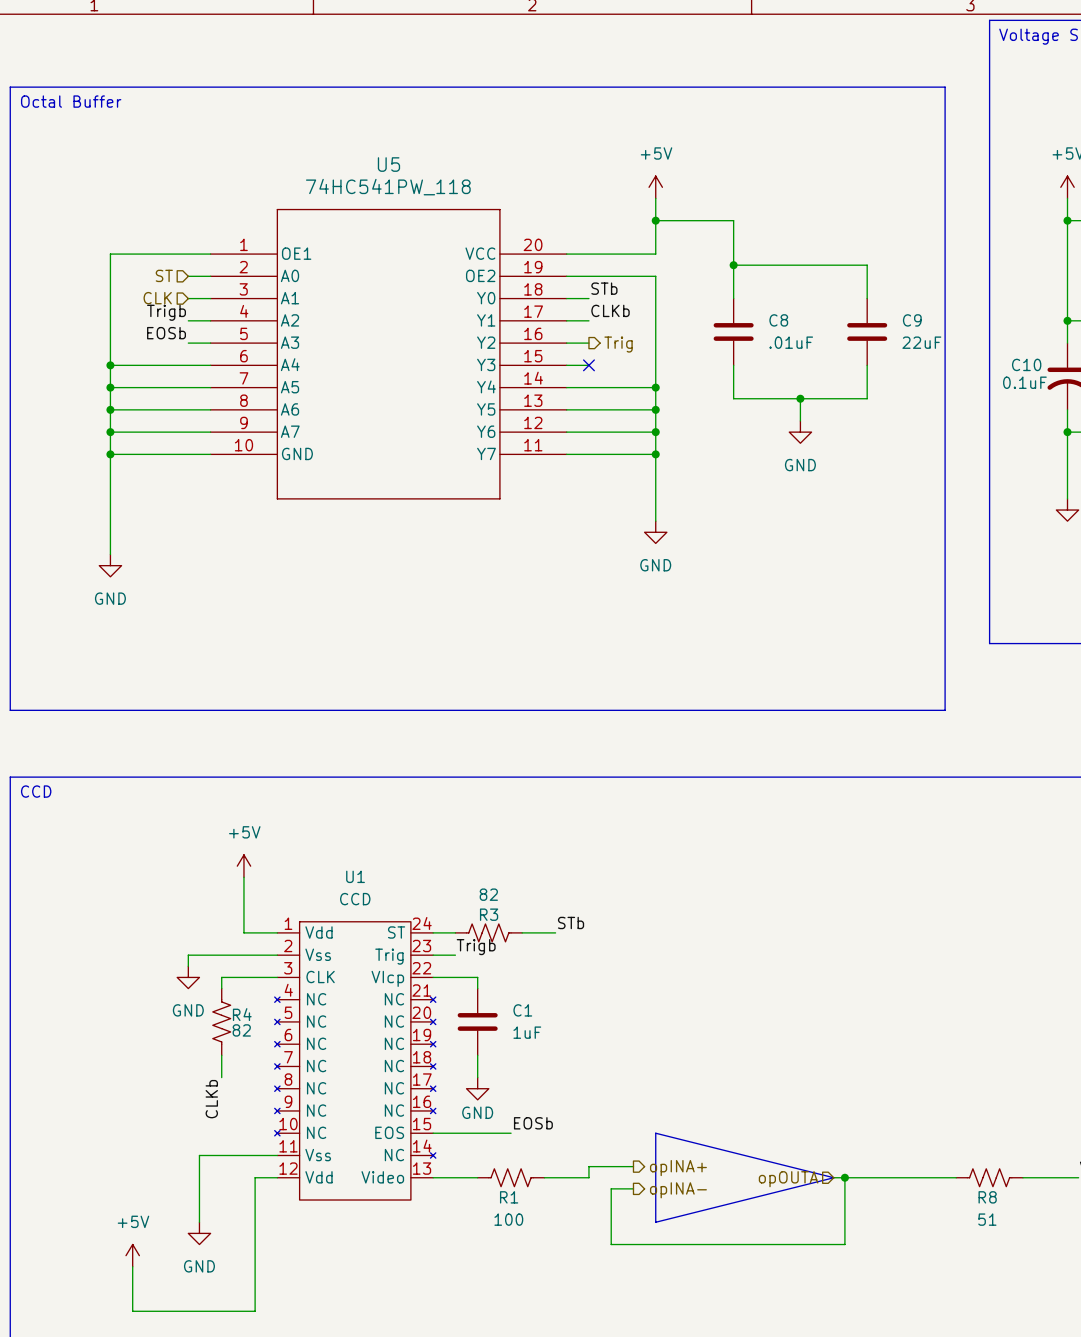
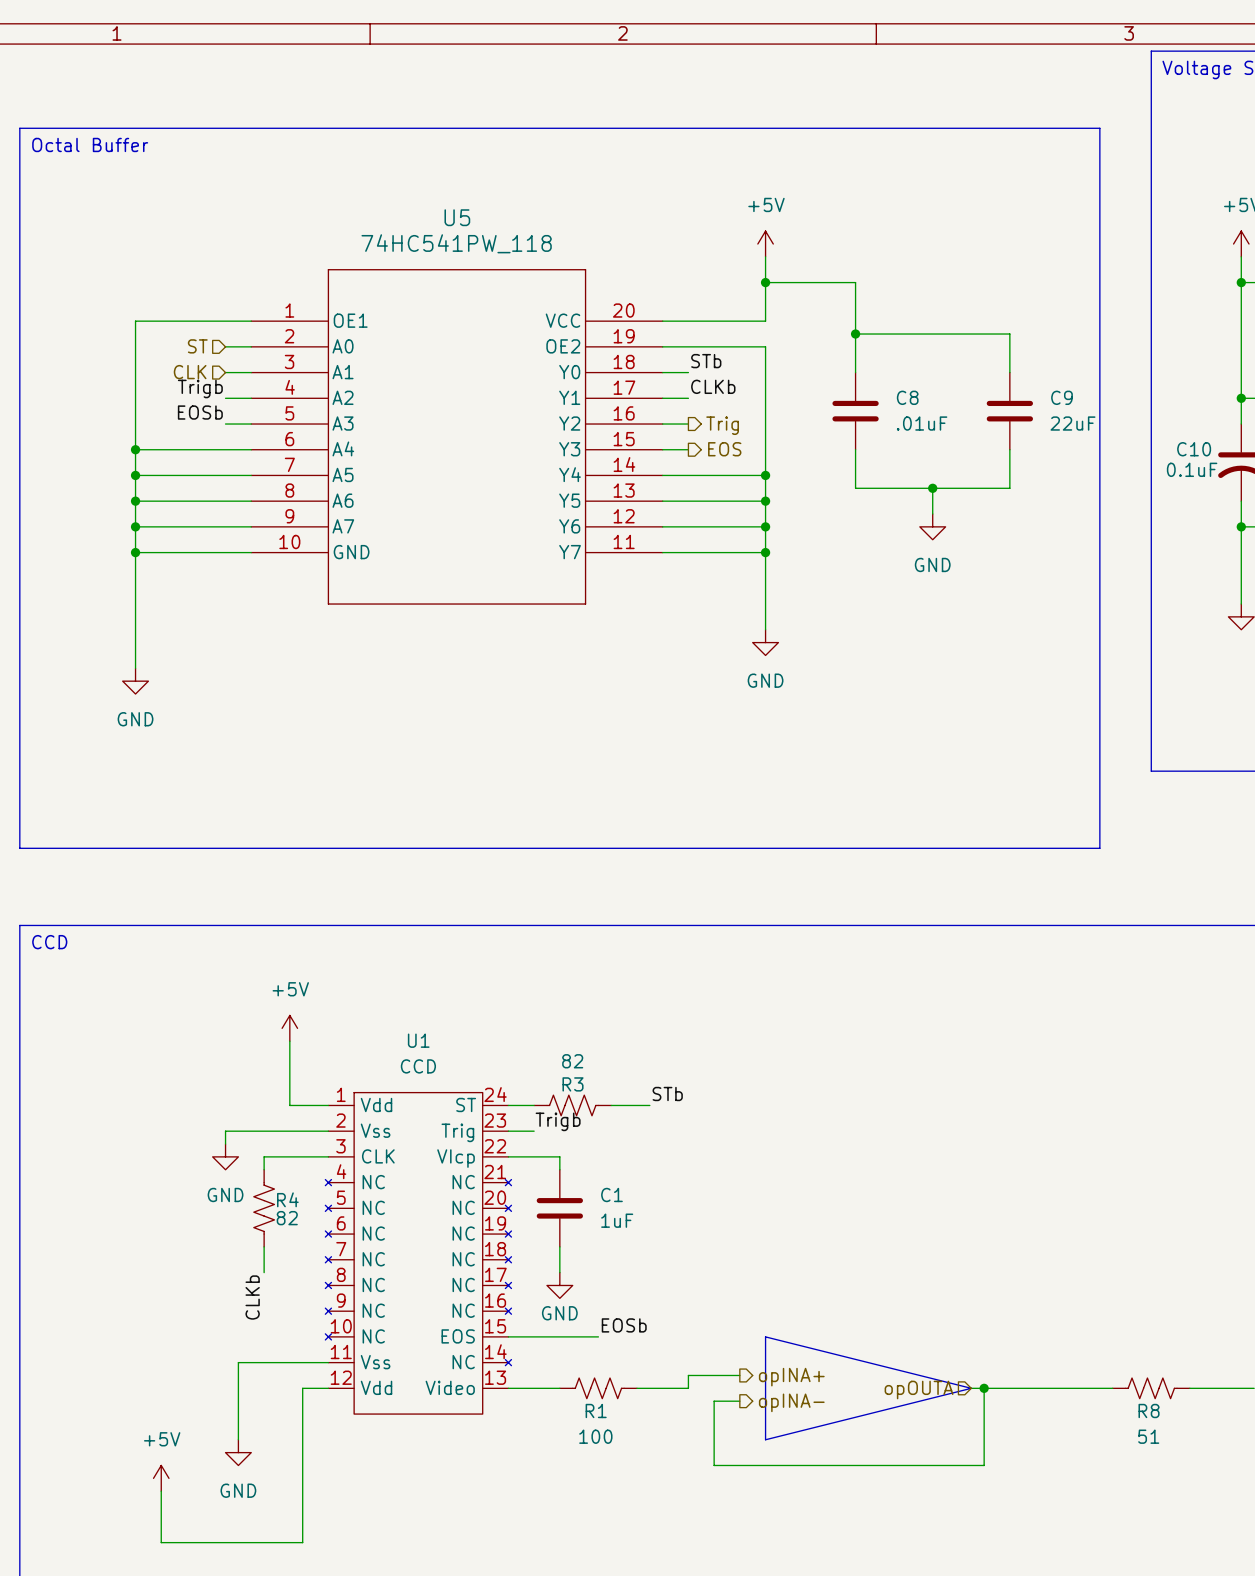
hierarchical label: none -> EOS (724, 449)
no-connect mark: (588, 365) -> none

